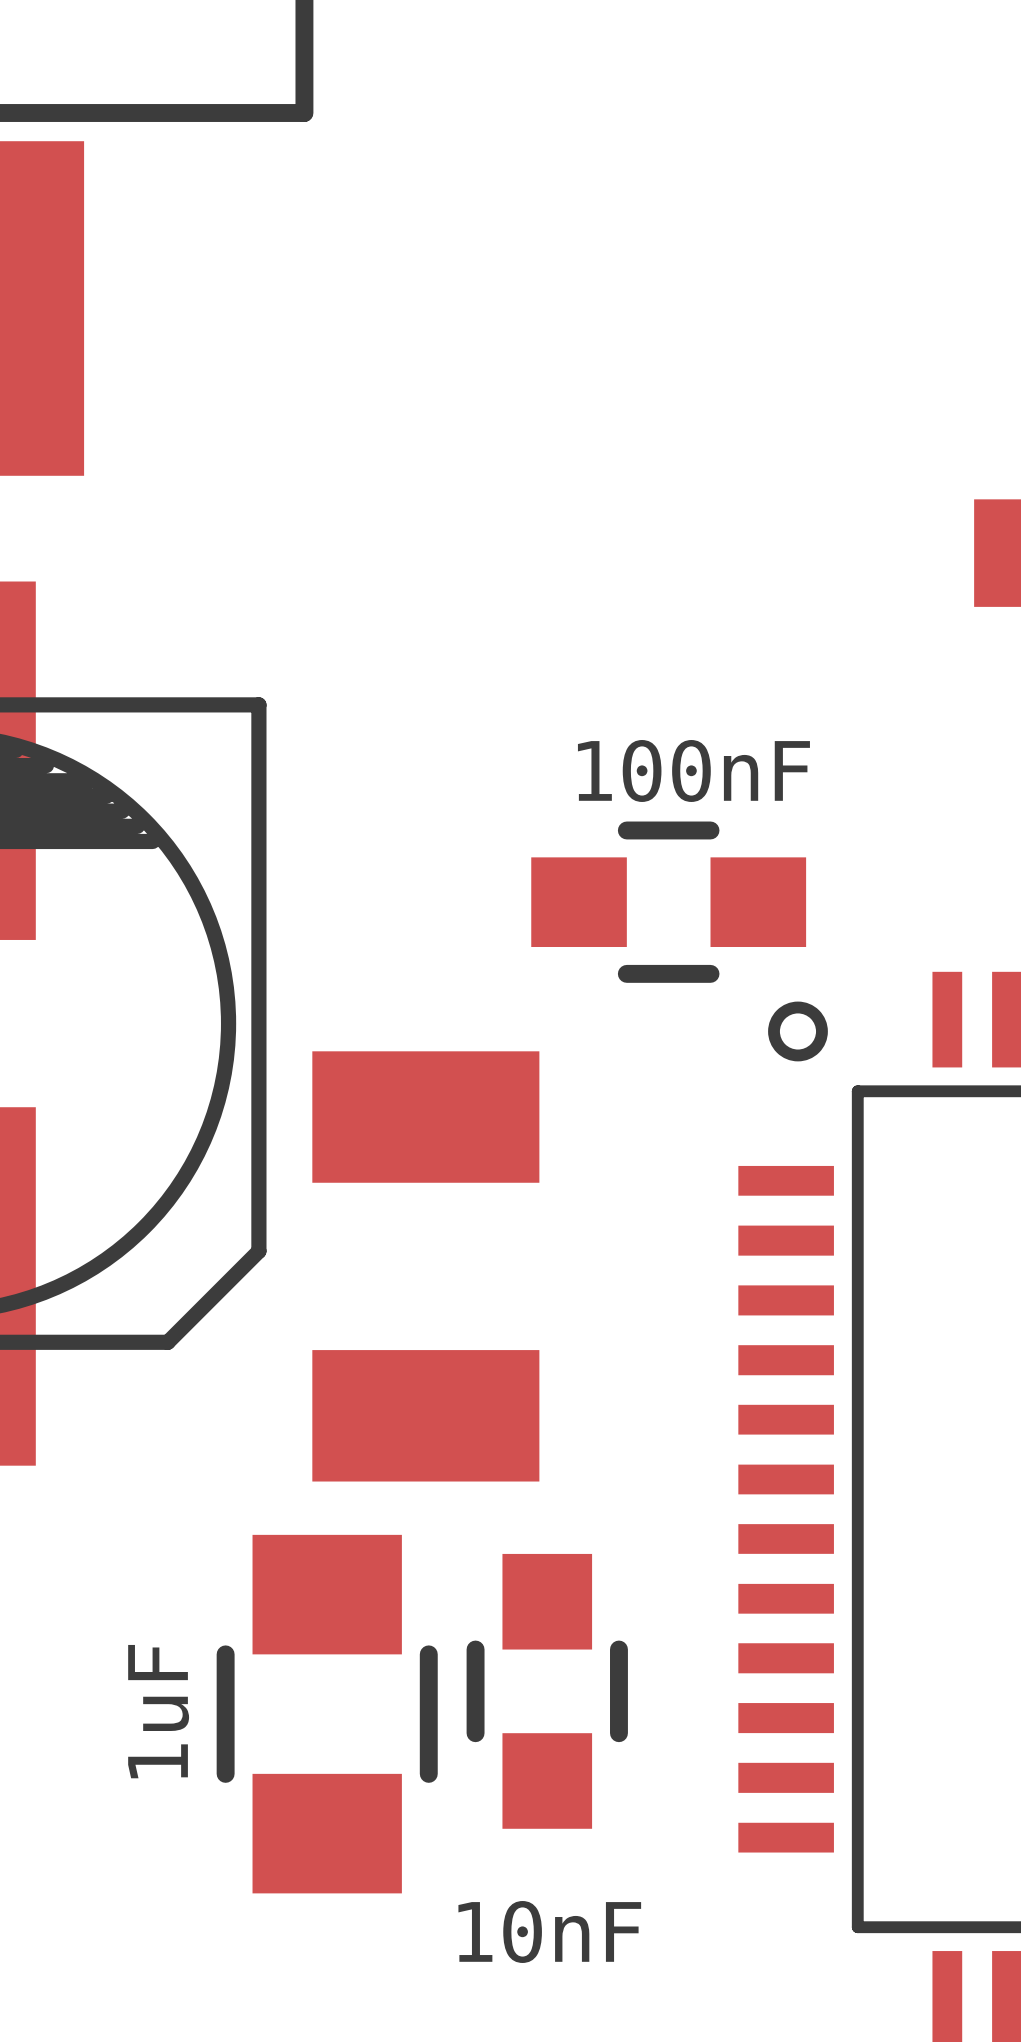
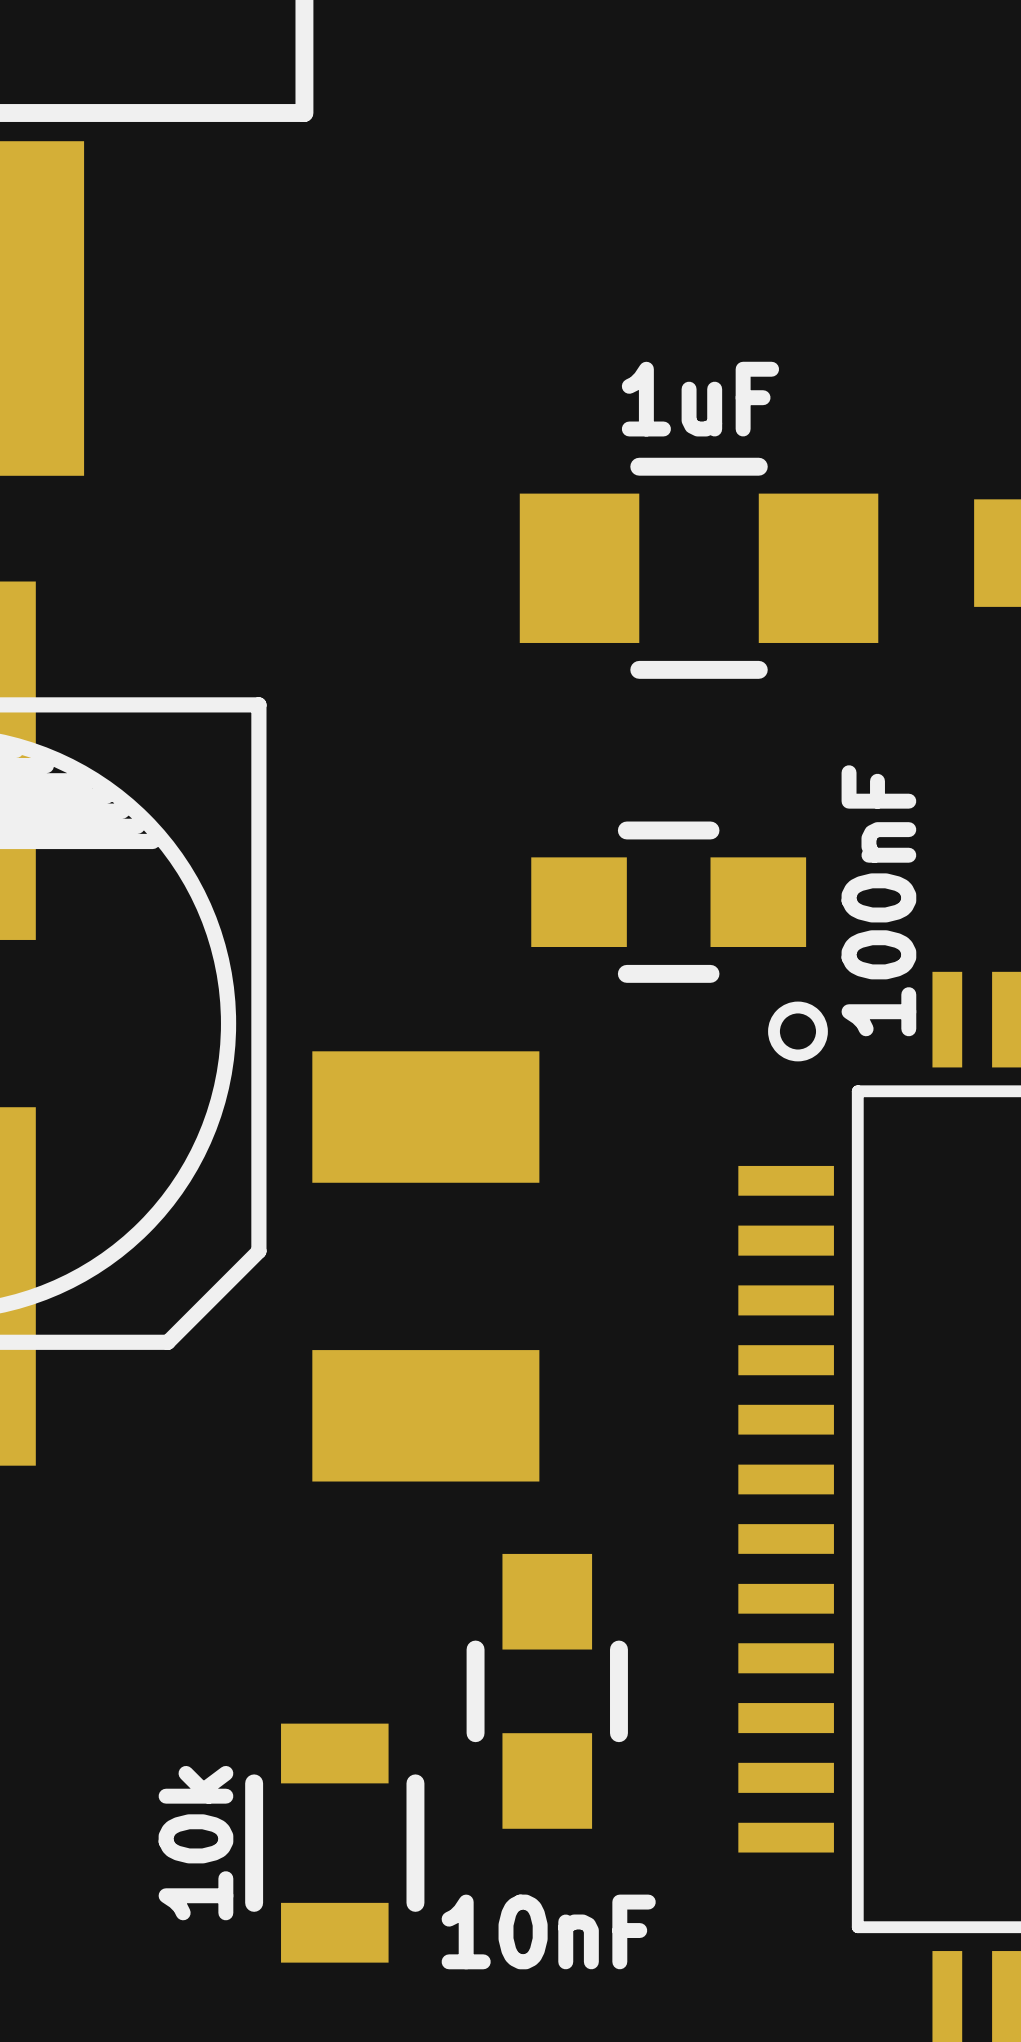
part value rotation: 0° (693, 770) -> 90° counterclockwise (878, 900)
part rotation: 0° (327, 1714) -> 90° clockwise (699, 568)
part position: (327, 1714) -> (699, 568)
part: none -> 10k (334, 1843)

